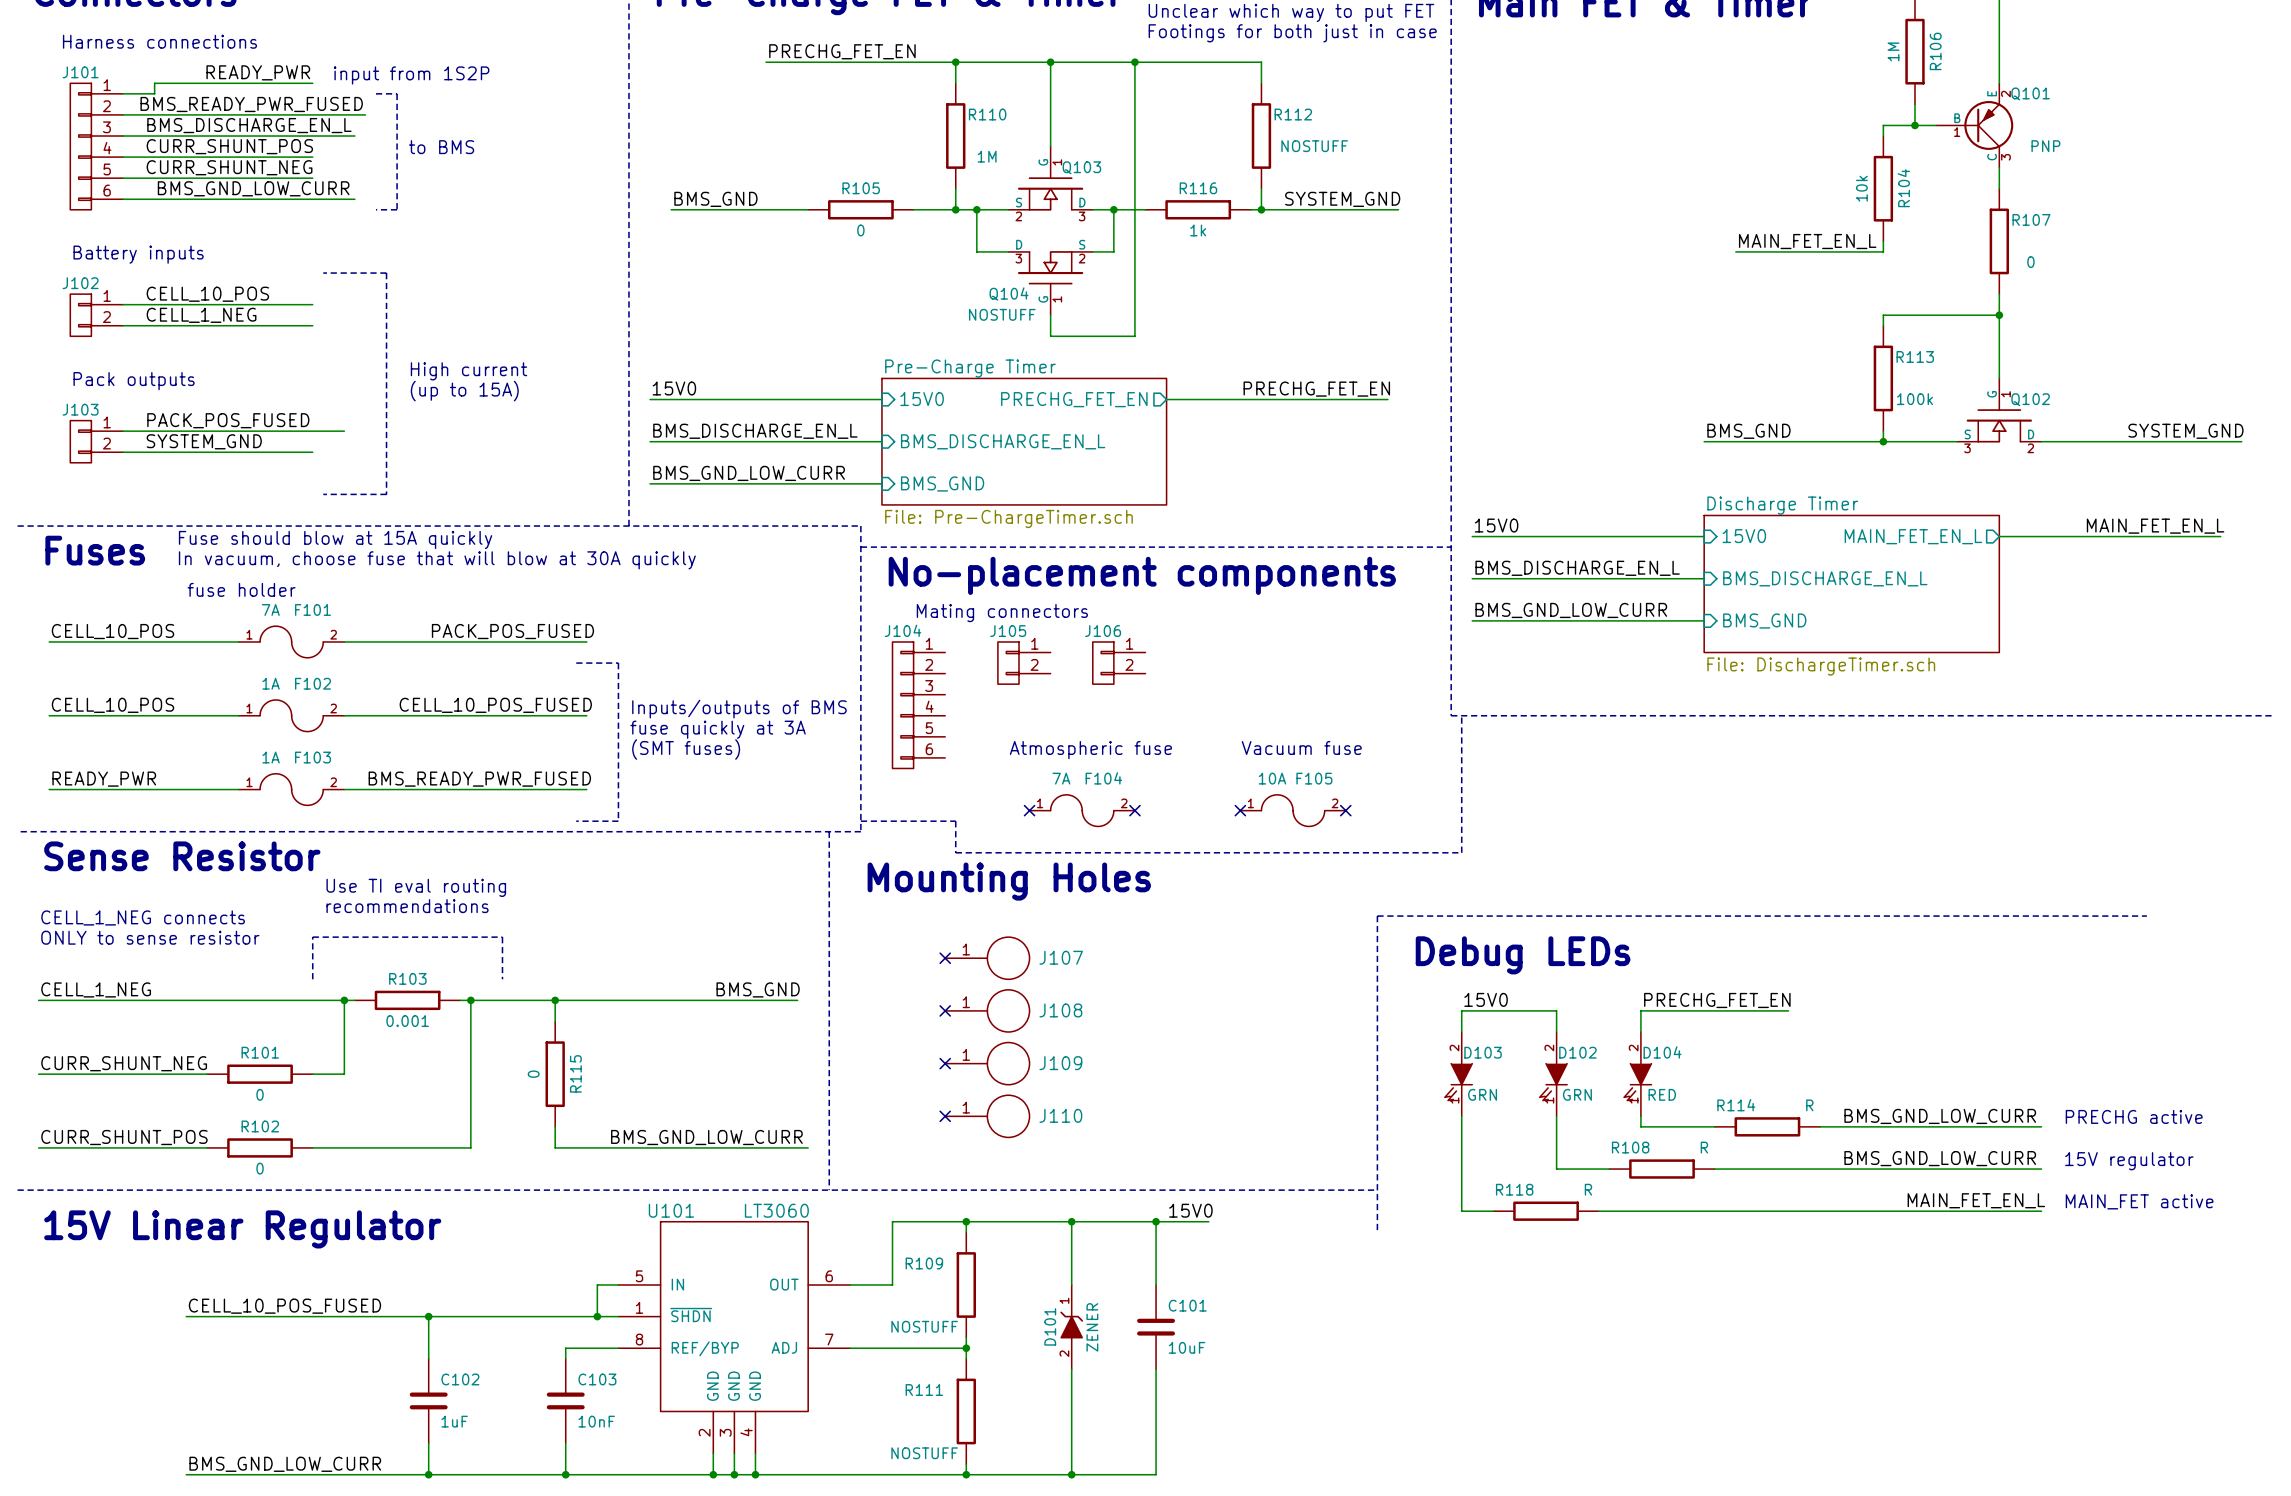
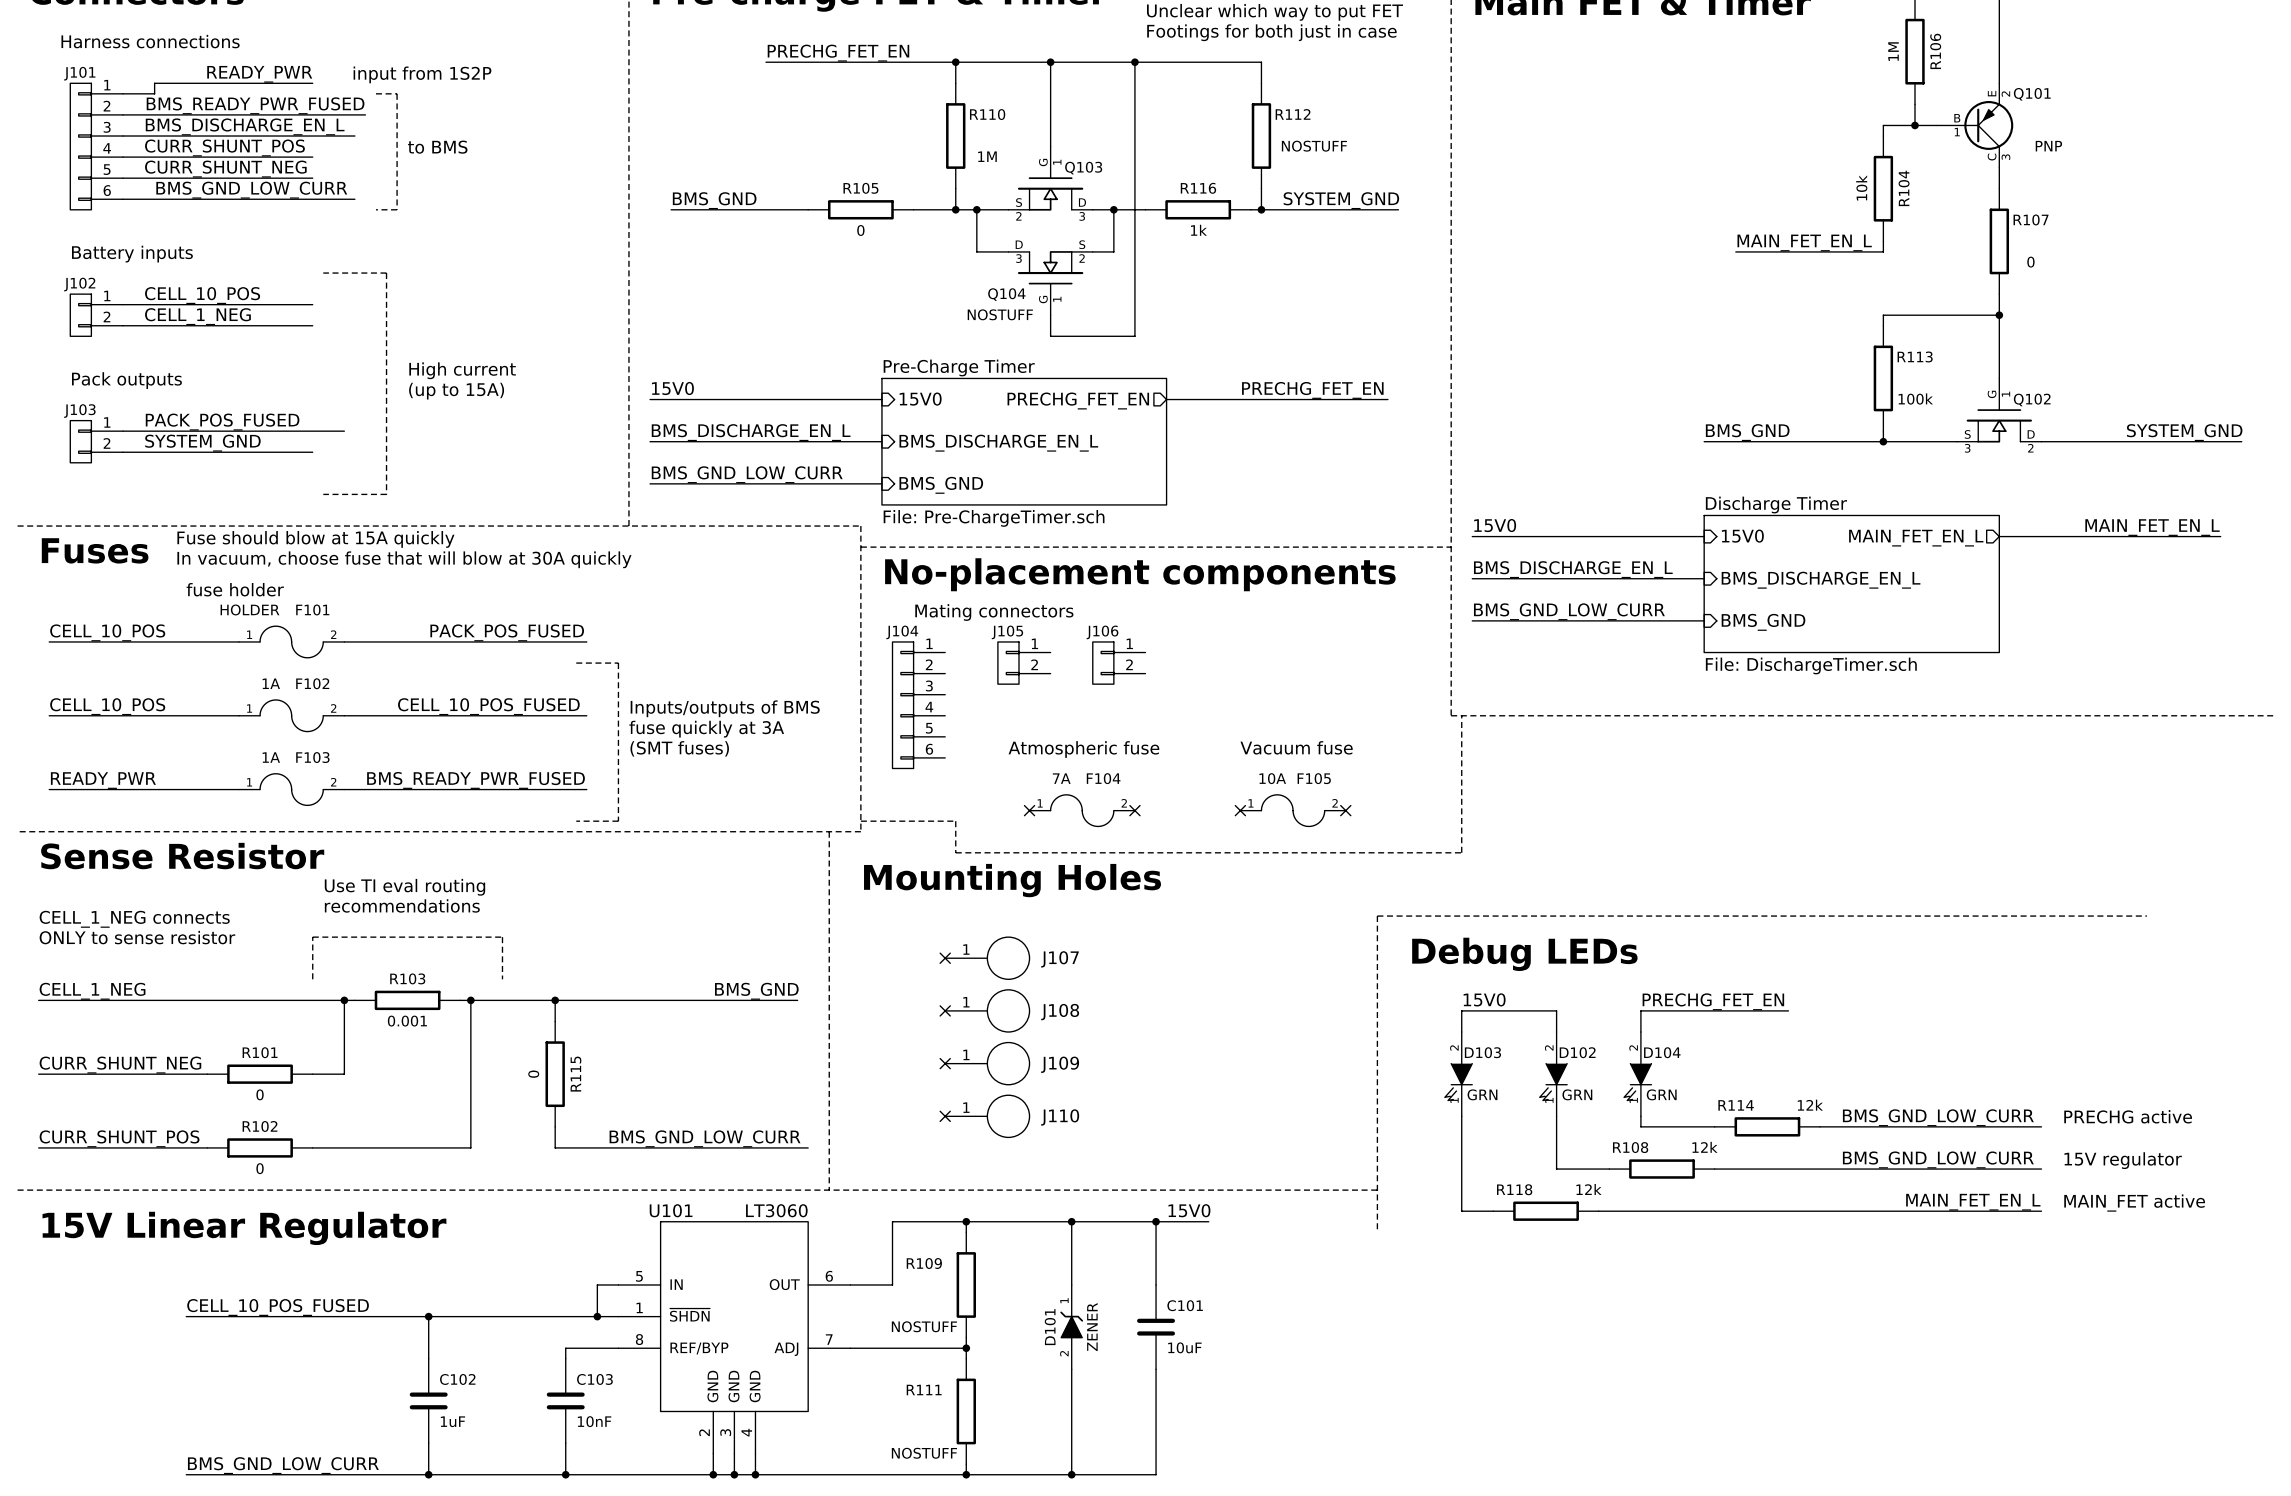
F101 value: 7A (270, 609) -> HOLDER (250, 609)
D104 value: RED (1662, 1094) -> GRN (1661, 1094)
R114 value: R (1809, 1105) -> 12k (1810, 1105)
R108 value: R (1704, 1147) -> 12k (1704, 1147)
R118 value: R (1588, 1189) -> 12k (1588, 1189)

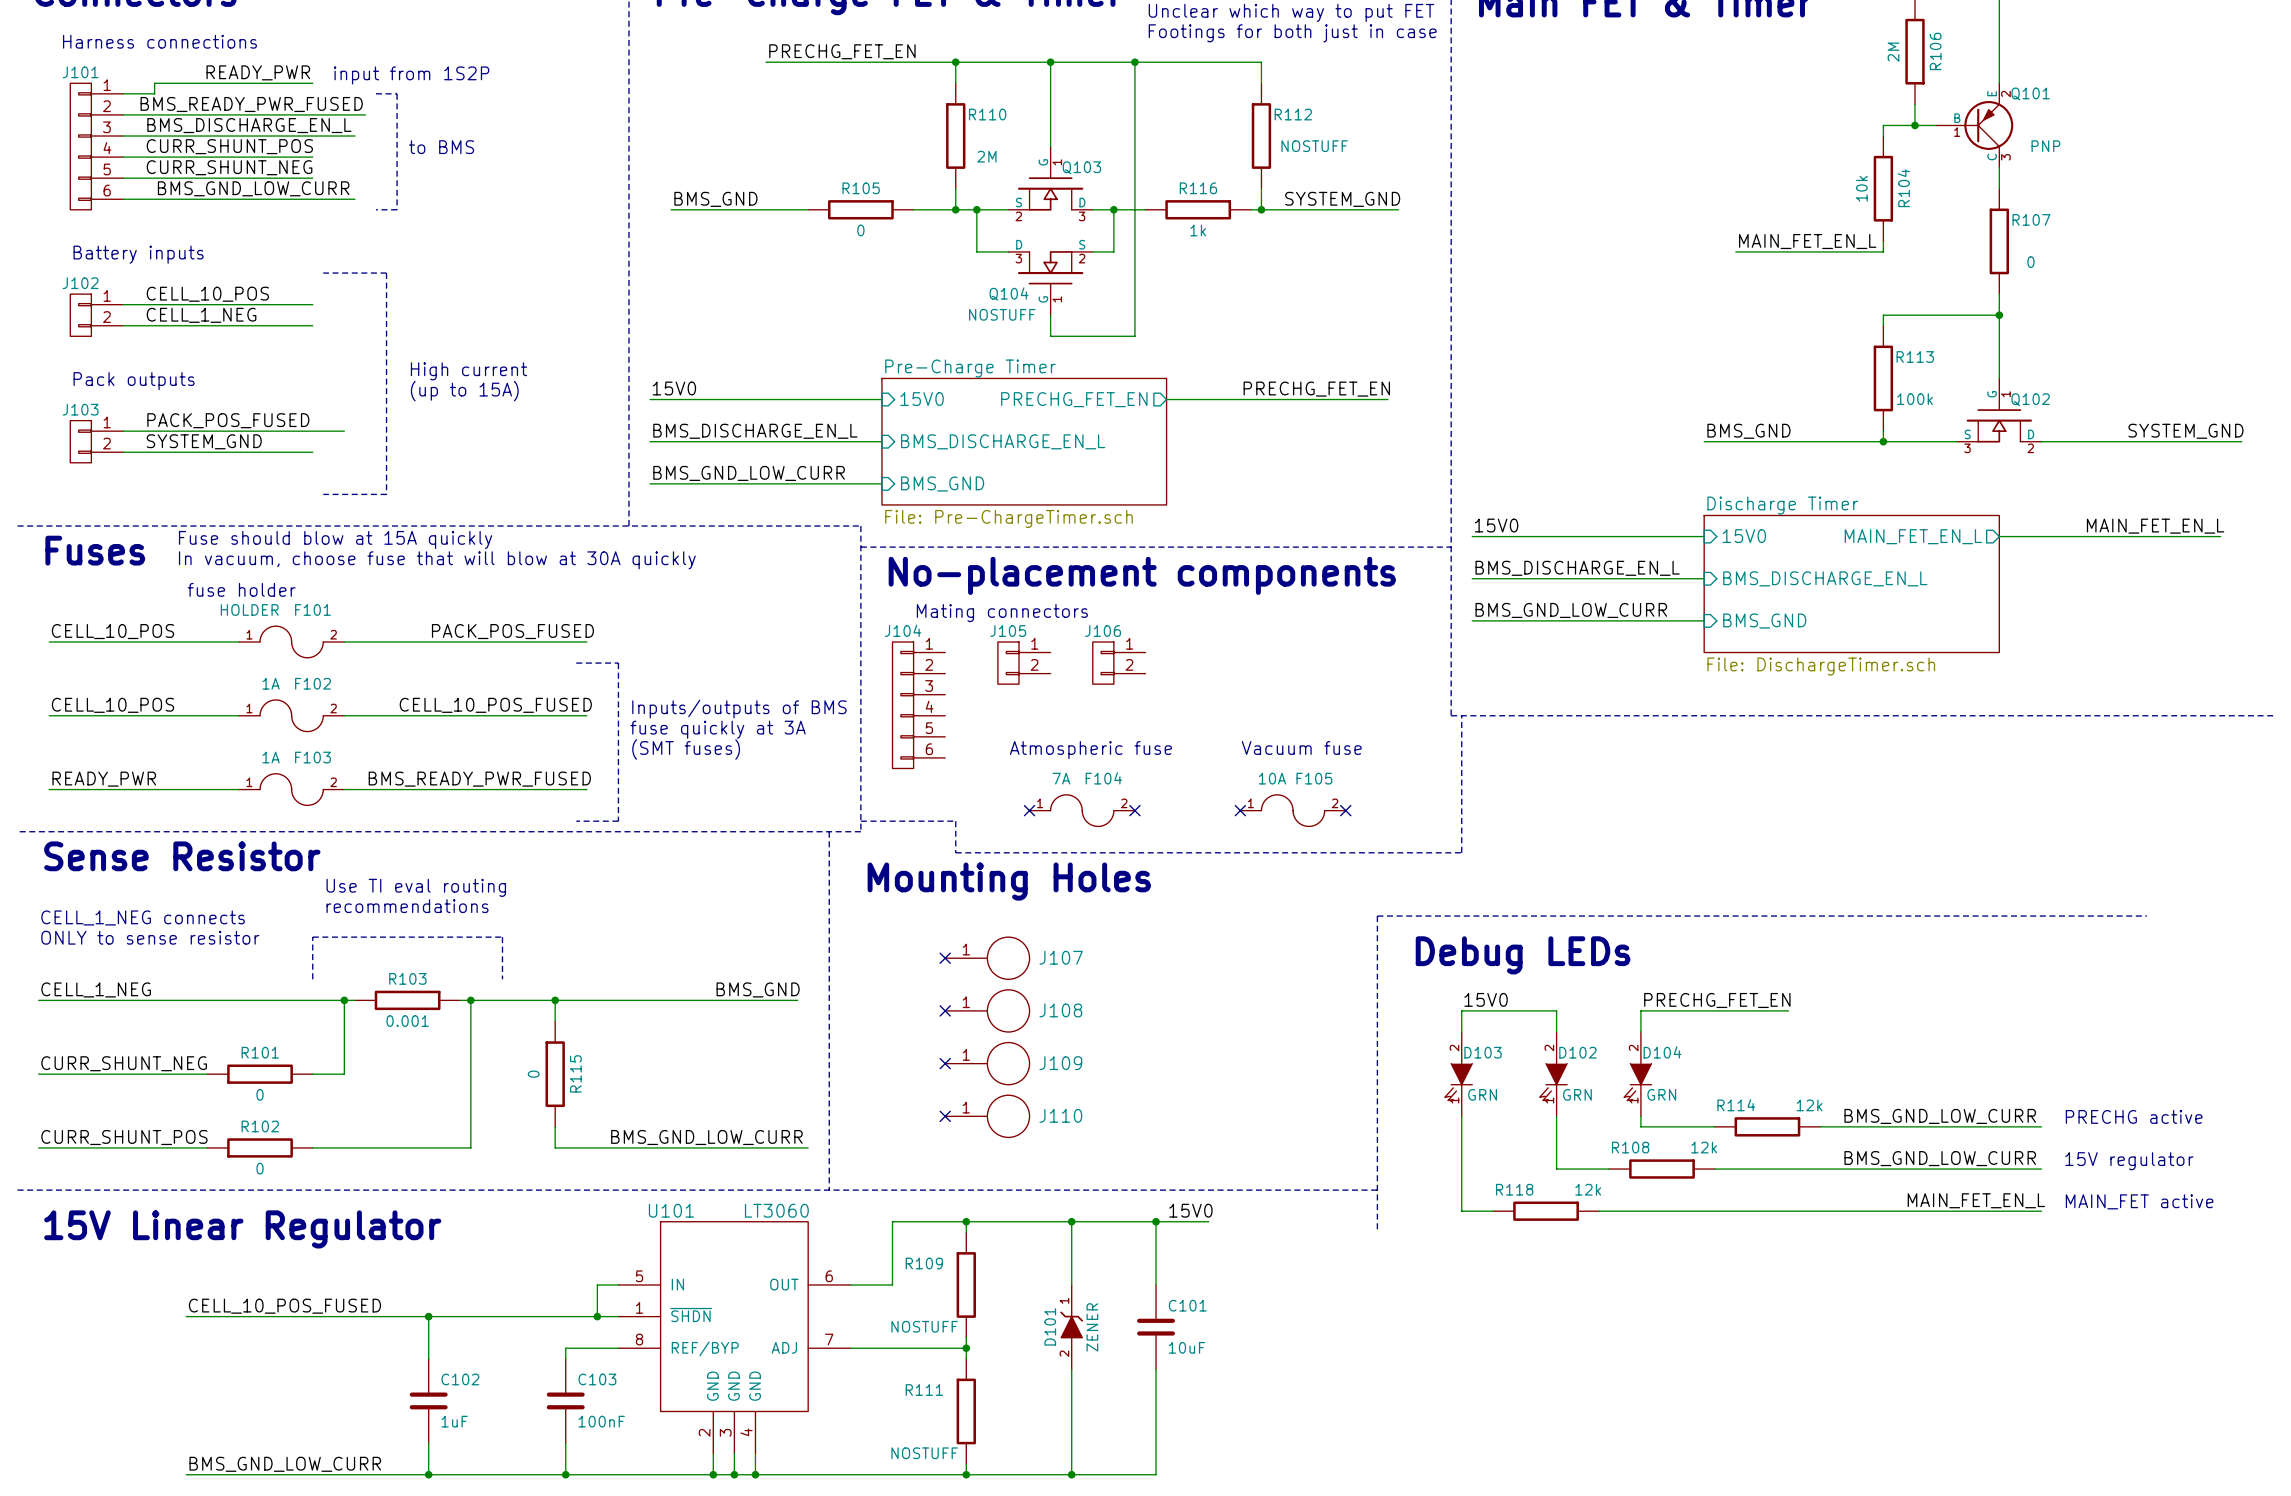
R106 value: 1M (1893, 51) -> 2M (1893, 52)
R110 value: 1M (987, 156) -> 2M (986, 156)
C103 value: 10nF (594, 1421) -> 100nF (601, 1421)

